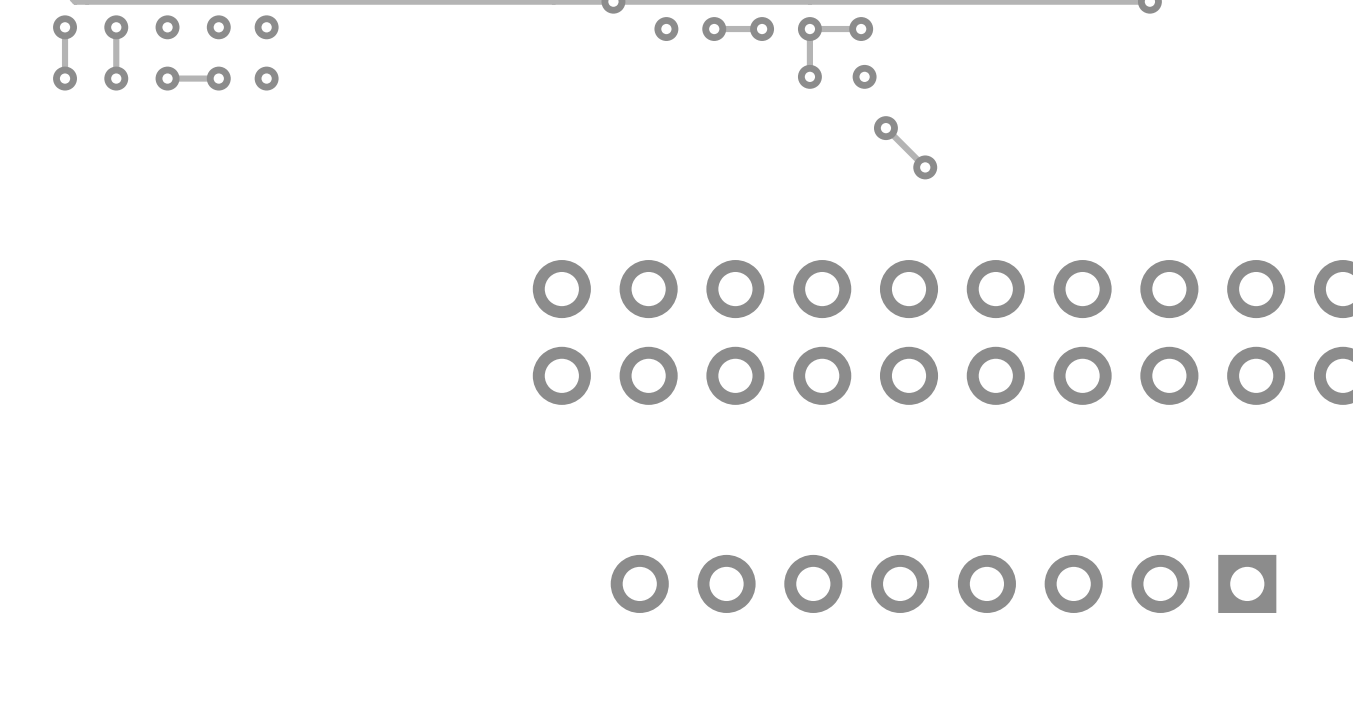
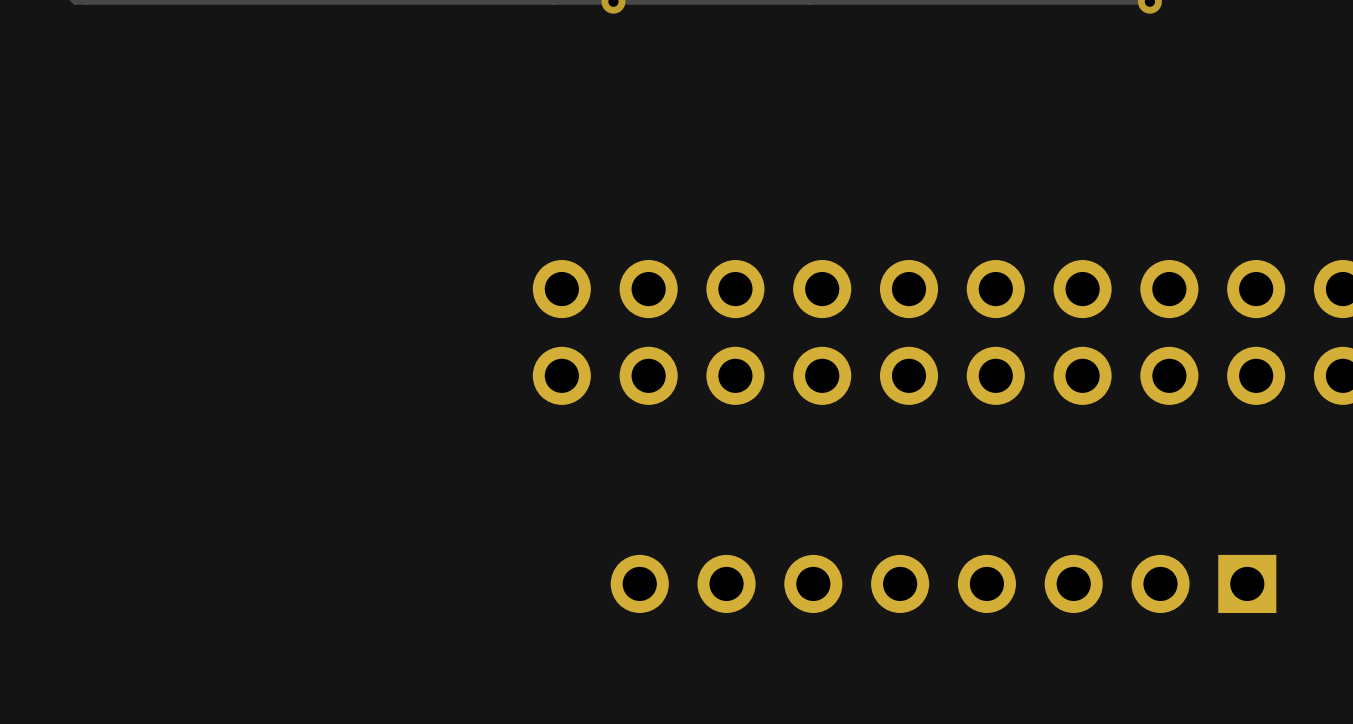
track: (65, 27) (65, 78) -> none
via: (65, 27) -> none
track: (116, 27) (116, 78) -> none
via: (116, 27) -> none
via: (167, 27) -> none
via: (218, 27) -> none
via: (266, 27) -> none
via: (666, 29) -> none
via: (714, 29) -> none
track: (762, 29) (714, 29) -> none
via: (762, 29) -> none
via: (809, 29) -> none
track: (861, 29) (809, 29) (809, 76) -> none
via: (861, 29) -> none
via: (809, 76) -> none
via: (864, 76) -> none
via: (65, 78) -> none
via: (116, 78) -> none
via: (167, 78) -> none
track: (218, 78) (167, 78) -> none
via: (218, 78) -> none
via: (266, 78) -> none
track: (885, 128) (925, 167) -> none
via: (885, 128) -> none
via: (925, 167) -> none

